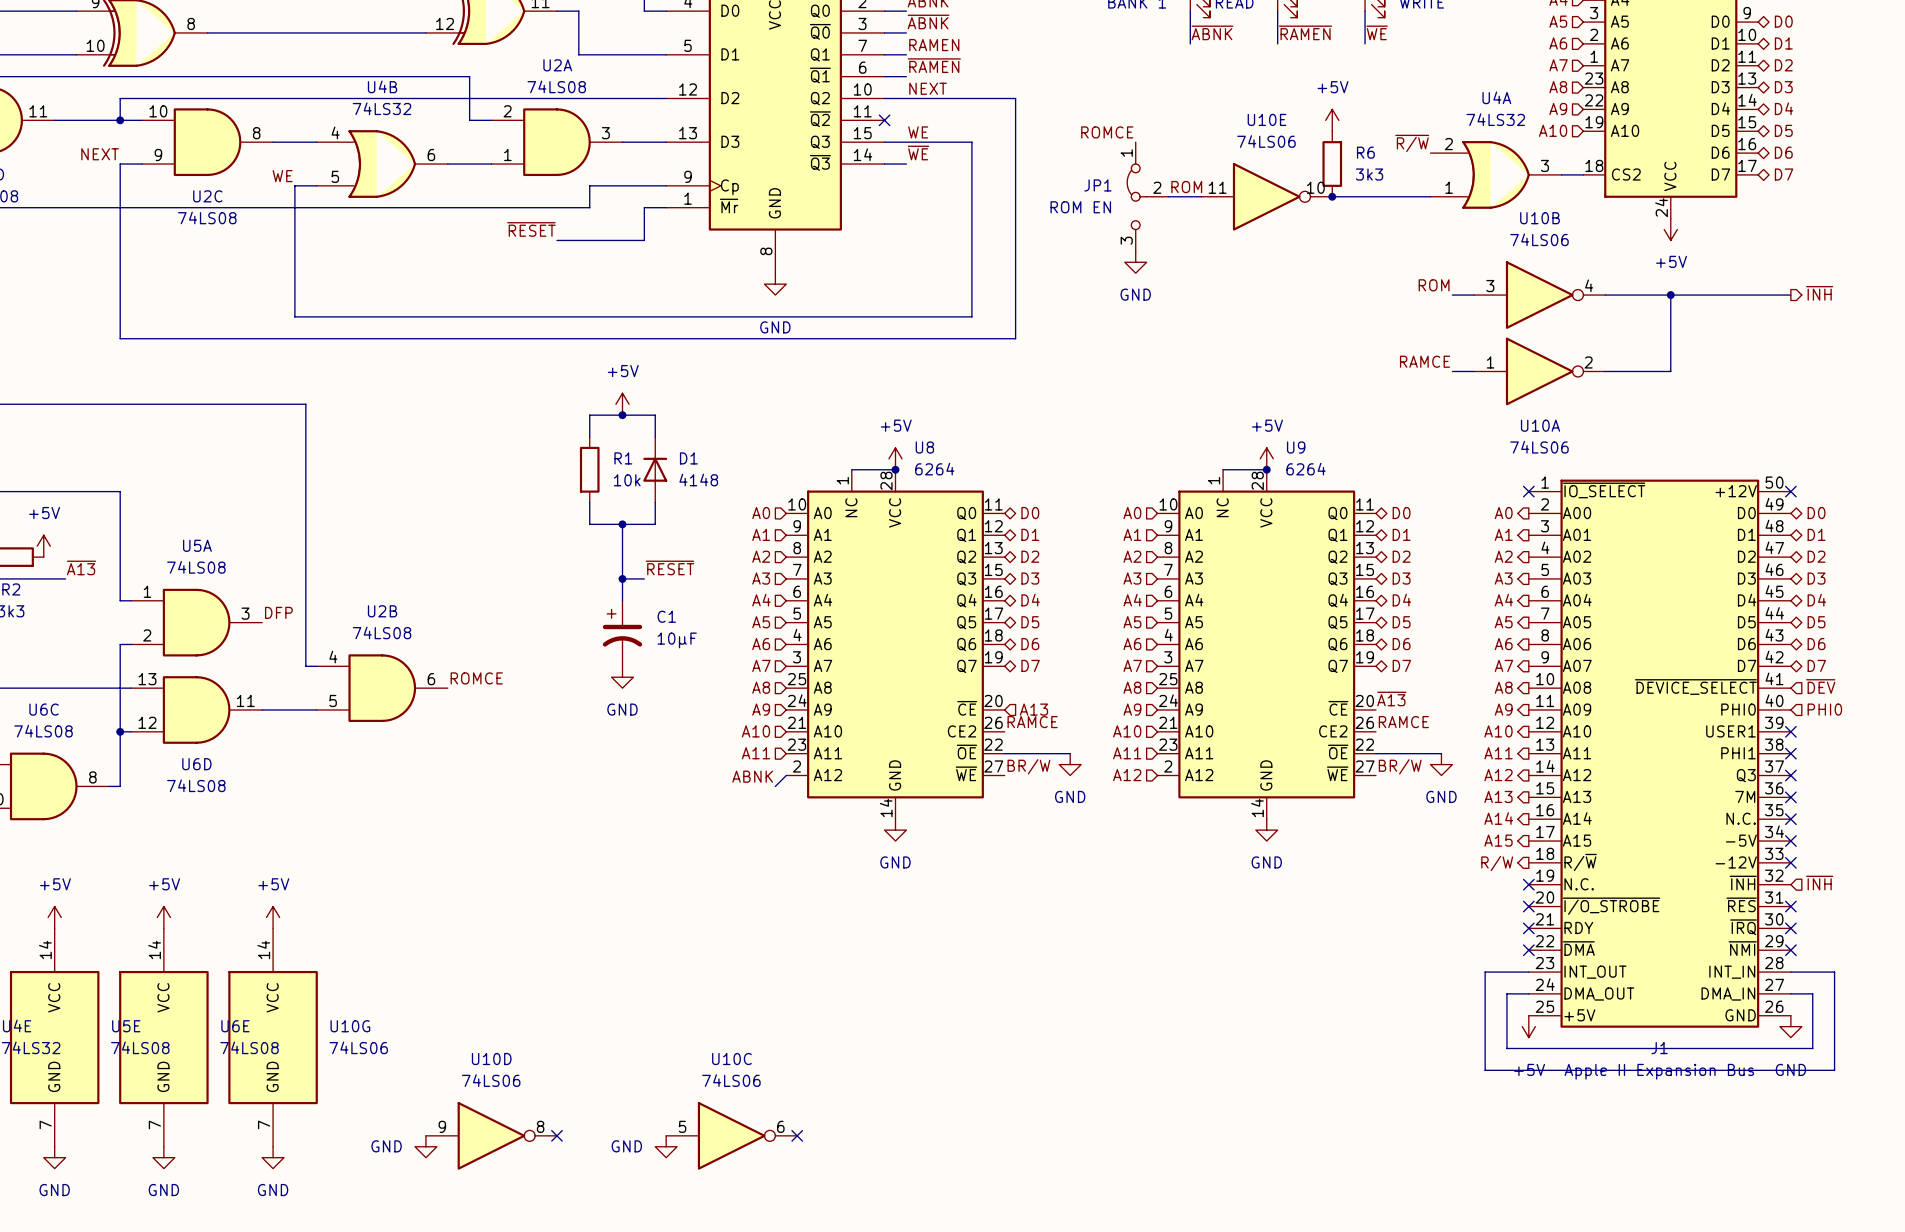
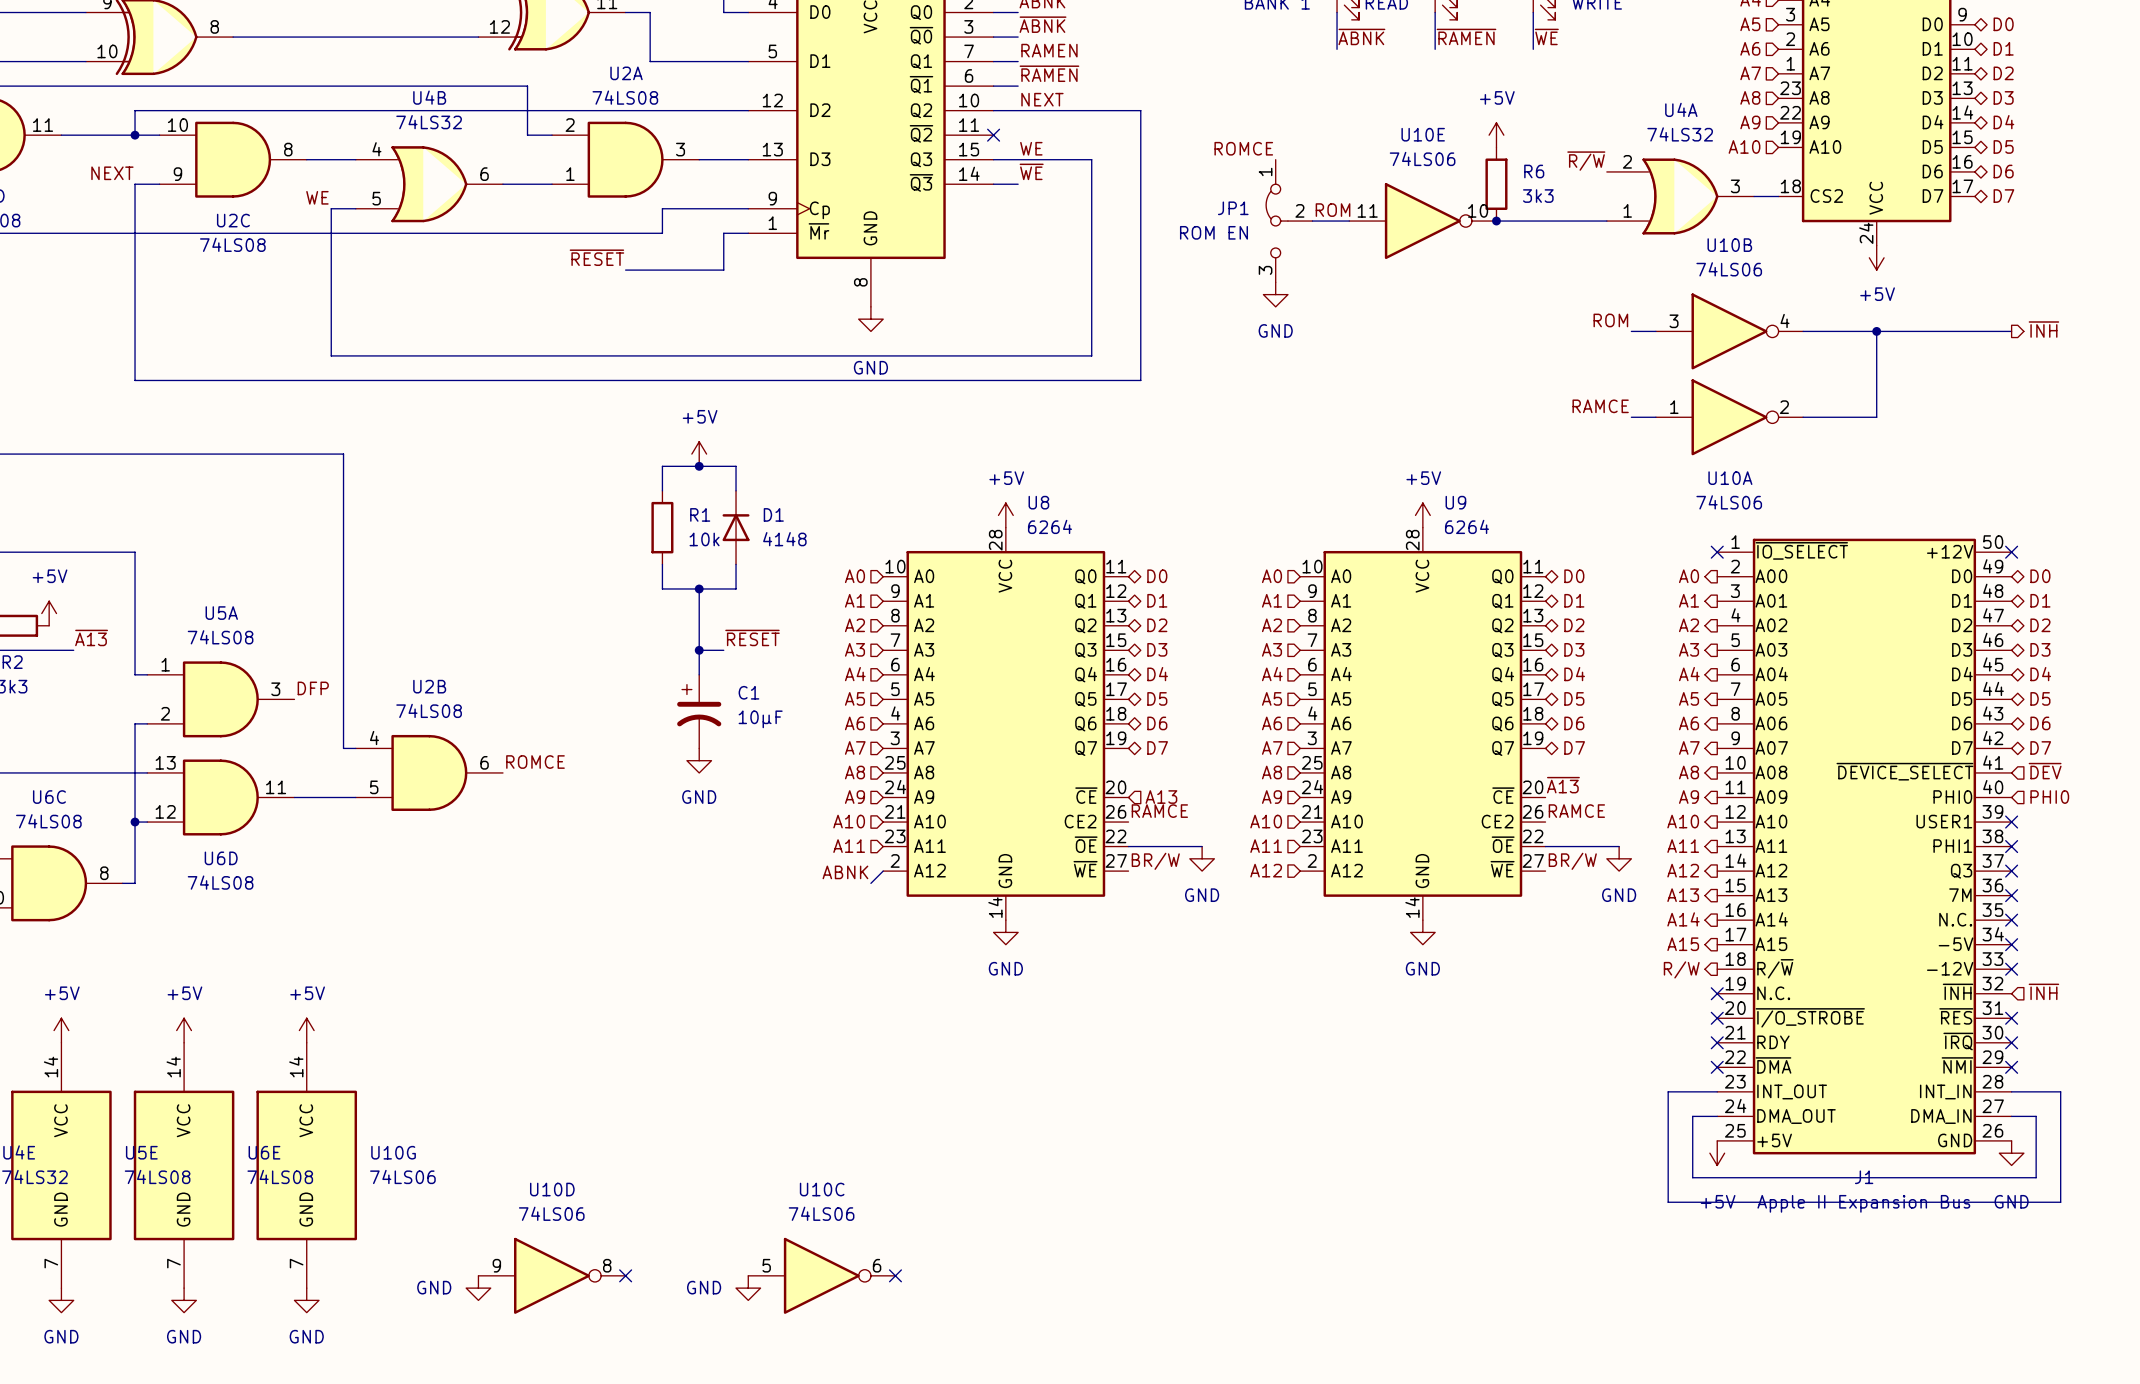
U8 symbol: [786, 469, 1005, 820] -> [883, 527, 1129, 921]
wire: (851, 469) (895, 469) -> none
junction: (895, 469) -> none
U9 symbol: [1157, 469, 1376, 820] -> [1300, 527, 1546, 921]
wire: (1223, 469) (1266, 469) -> none
junction: (1266, 469) -> none

